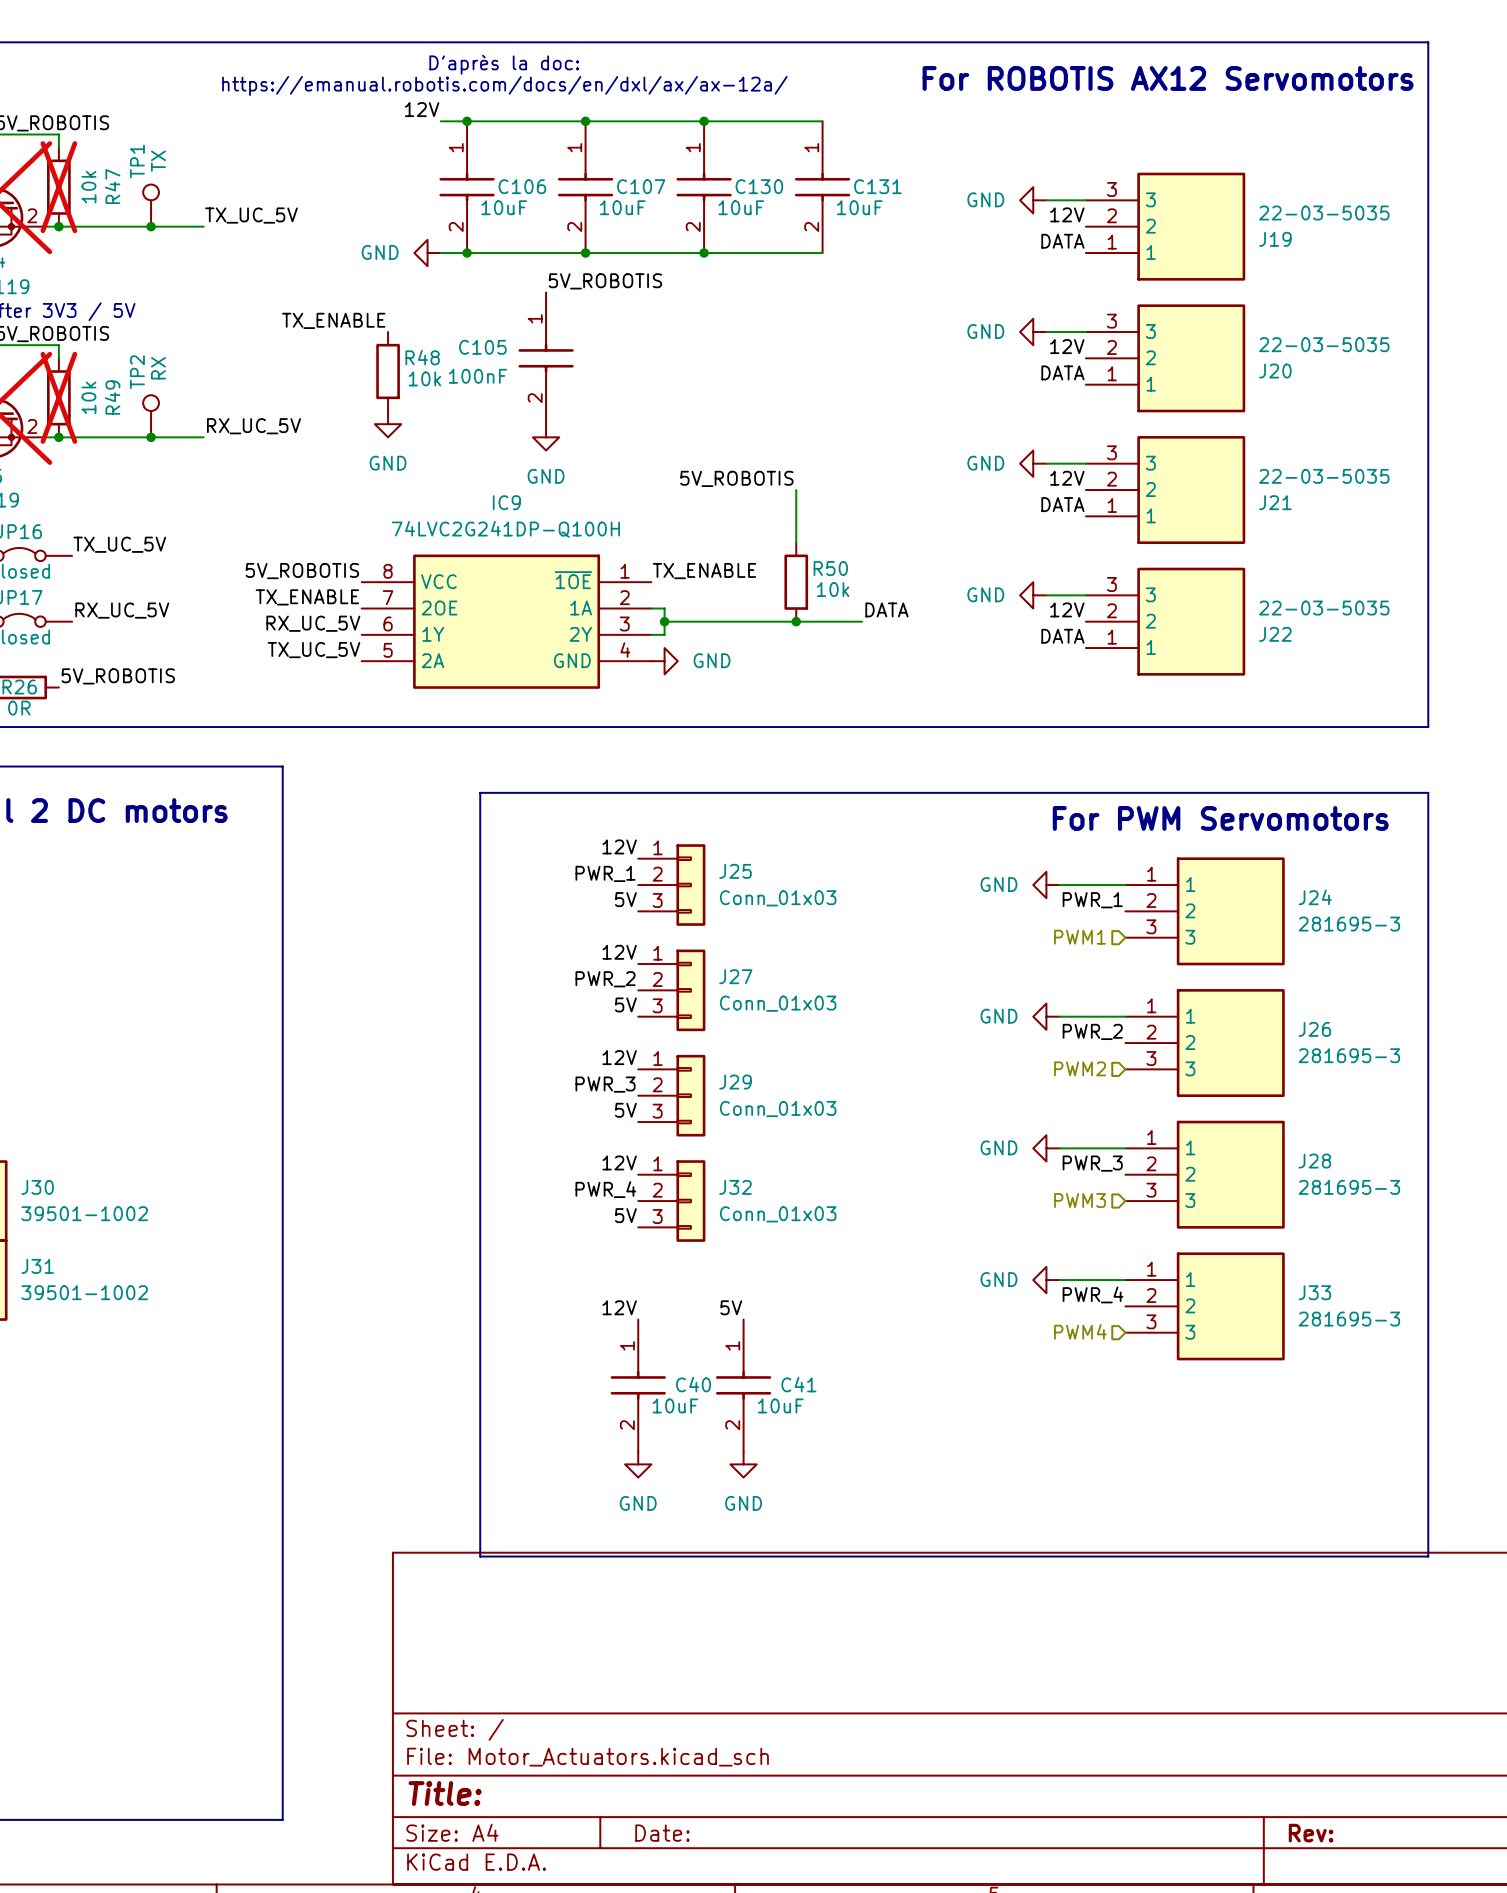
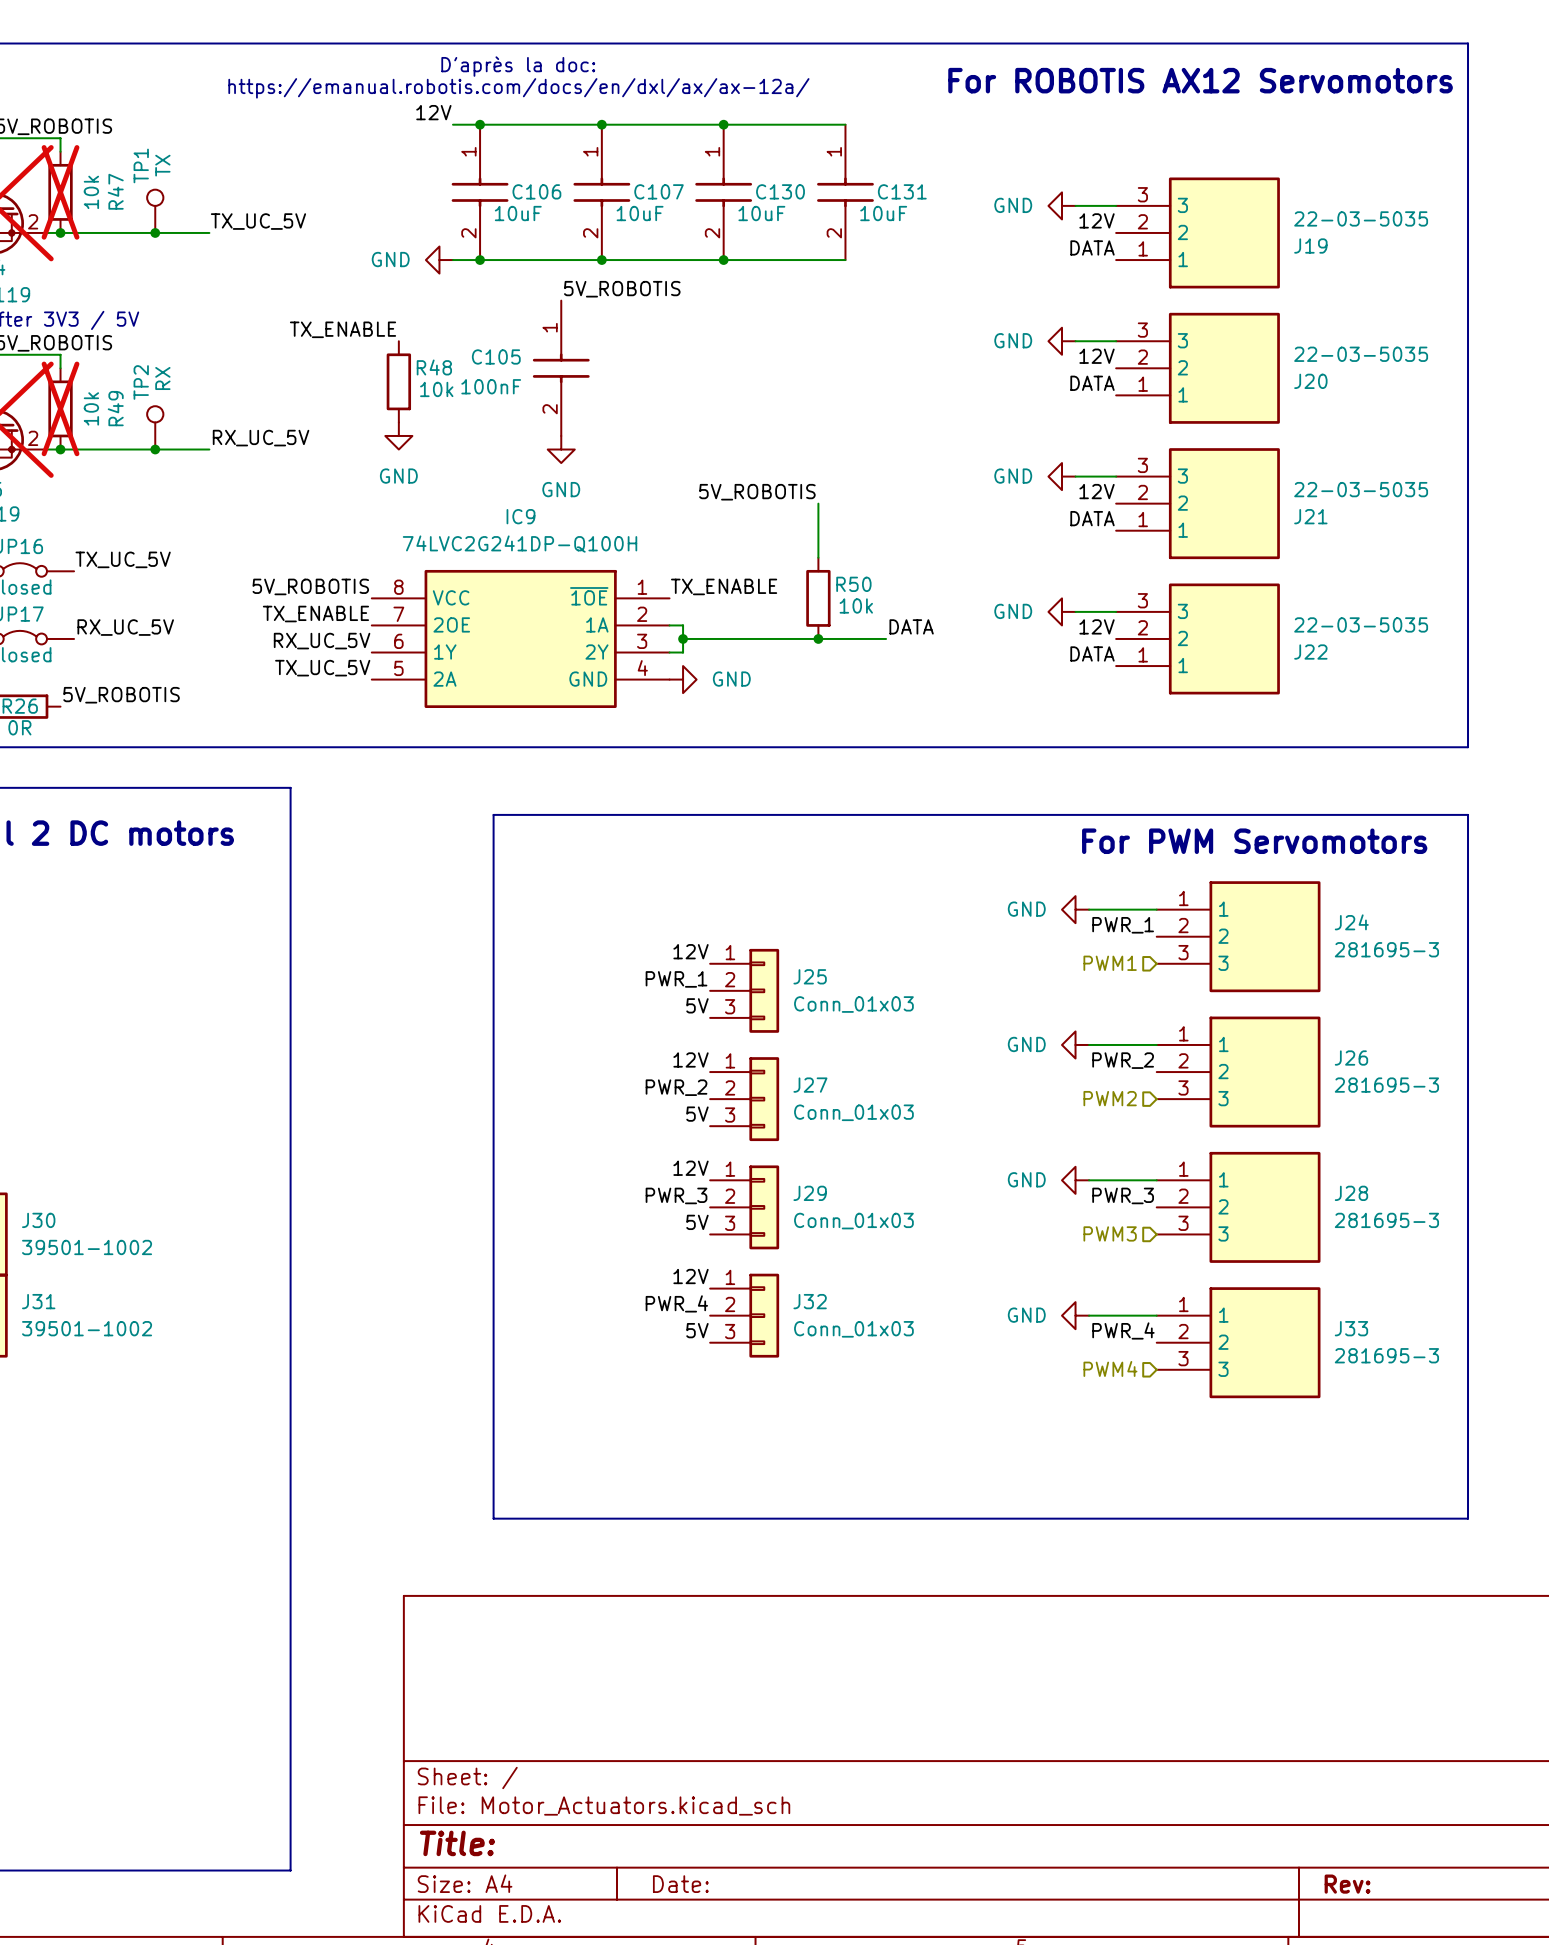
label: 12V (619, 846) -> none
label position: PWR_1 (605, 873) -> PWR_1 (676, 979)
J25 position: (671, 885) -> (744, 990)
label: 5V (625, 899) -> none
label: none -> 12V (691, 951)
label: 12V (619, 952) -> none
label: none -> 5V (697, 1005)
label position: PWR_2 (605, 979) -> PWR_2 (676, 1087)
J27 position: (671, 990) -> (744, 1099)
label: 5V (625, 1004) -> none
label: none -> 12V (691, 1059)
label: 12V (619, 1057) -> none
label: none -> 5V (697, 1114)
label position: PWR_3 (605, 1084) -> PWR_3 (676, 1195)
J29 position: (671, 1095) -> (744, 1207)
label: 5V (625, 1110) -> none
label: none -> 12V (691, 1168)
label: 12V (619, 1162) -> none
label position: PWR_4 (605, 1189) -> PWR_4 (676, 1303)
label: none -> 5V (697, 1222)
J32 position: (671, 1201) -> (744, 1315)
label: 5V (625, 1215) -> none
label: none -> 12V (691, 1276)
label: none -> 5V (697, 1330)
label: 12V (619, 1307) -> none
label: 5V (731, 1307) -> none
C40: 10uF (638, 1385) -> none
C41: 10uF (743, 1385) -> none
power symbol: GND (638, 1464) -> none
power symbol: GND (743, 1464) -> none
line: (480, 1477) (480, 1556) (1428, 1556) (1428, 1477) -> (493, 1518) (1468, 1518)

